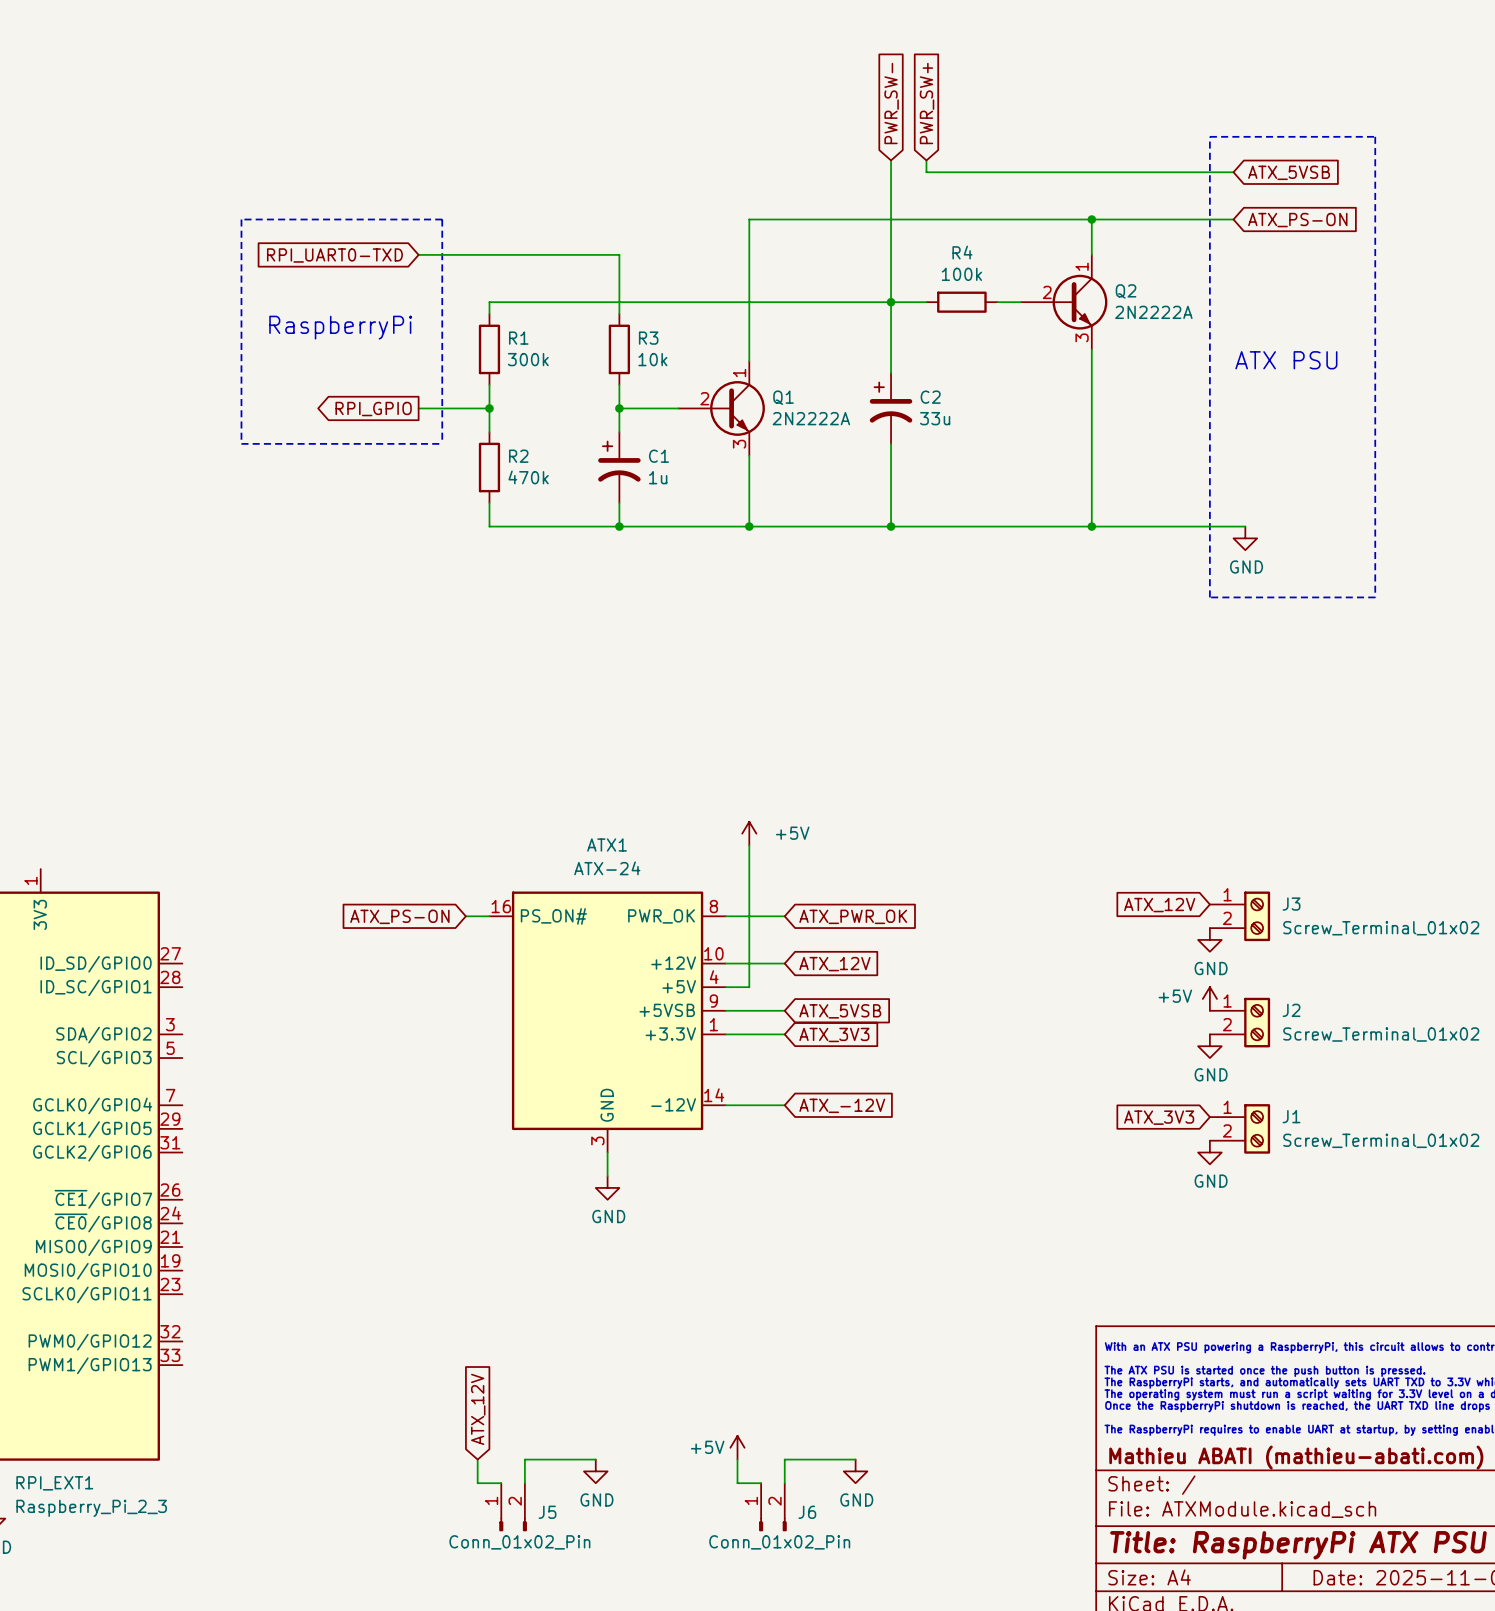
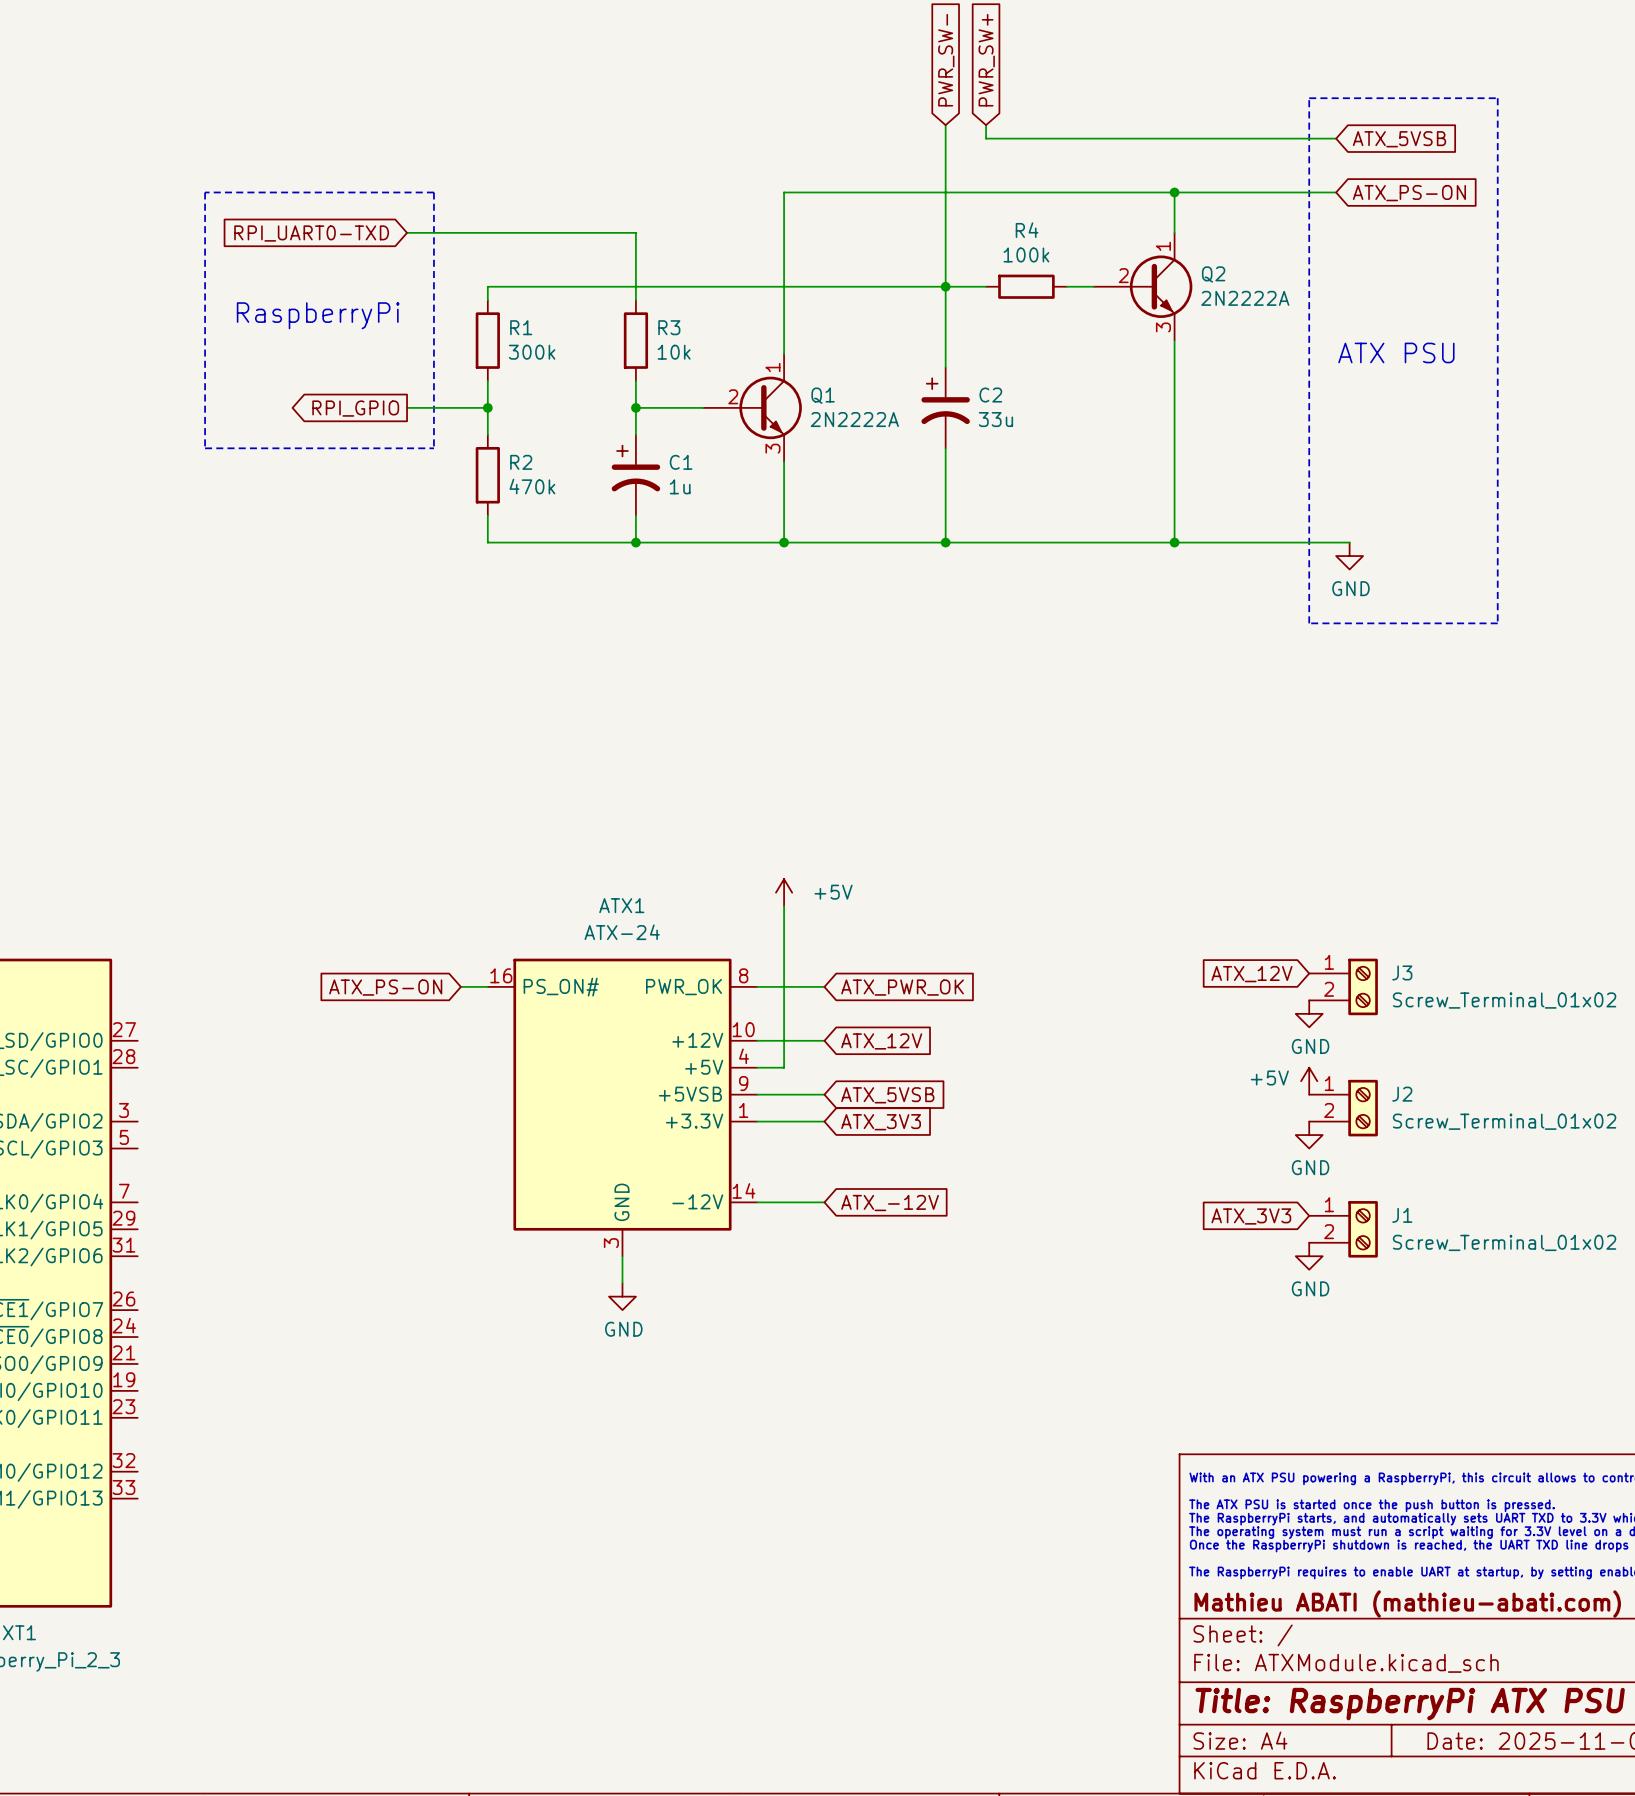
global label: ATX_12V (478, 1409) -> none
power symbol: +5V (737, 1447) -> none
wire: (477, 1459) (477, 1483) (501, 1483) -> none
wire: (595, 1459) (524, 1459) (524, 1483) -> none
wire: (737, 1459) (737, 1483) (761, 1483) -> none
wire: (855, 1459) (784, 1459) (784, 1483) -> none
power symbol: GND (595, 1471) -> none
power symbol: GND (855, 1471) -> none
J5: Conn_01x02_Pin (513, 1507) -> none
J6: Conn_01x02_Pin (772, 1507) -> none

